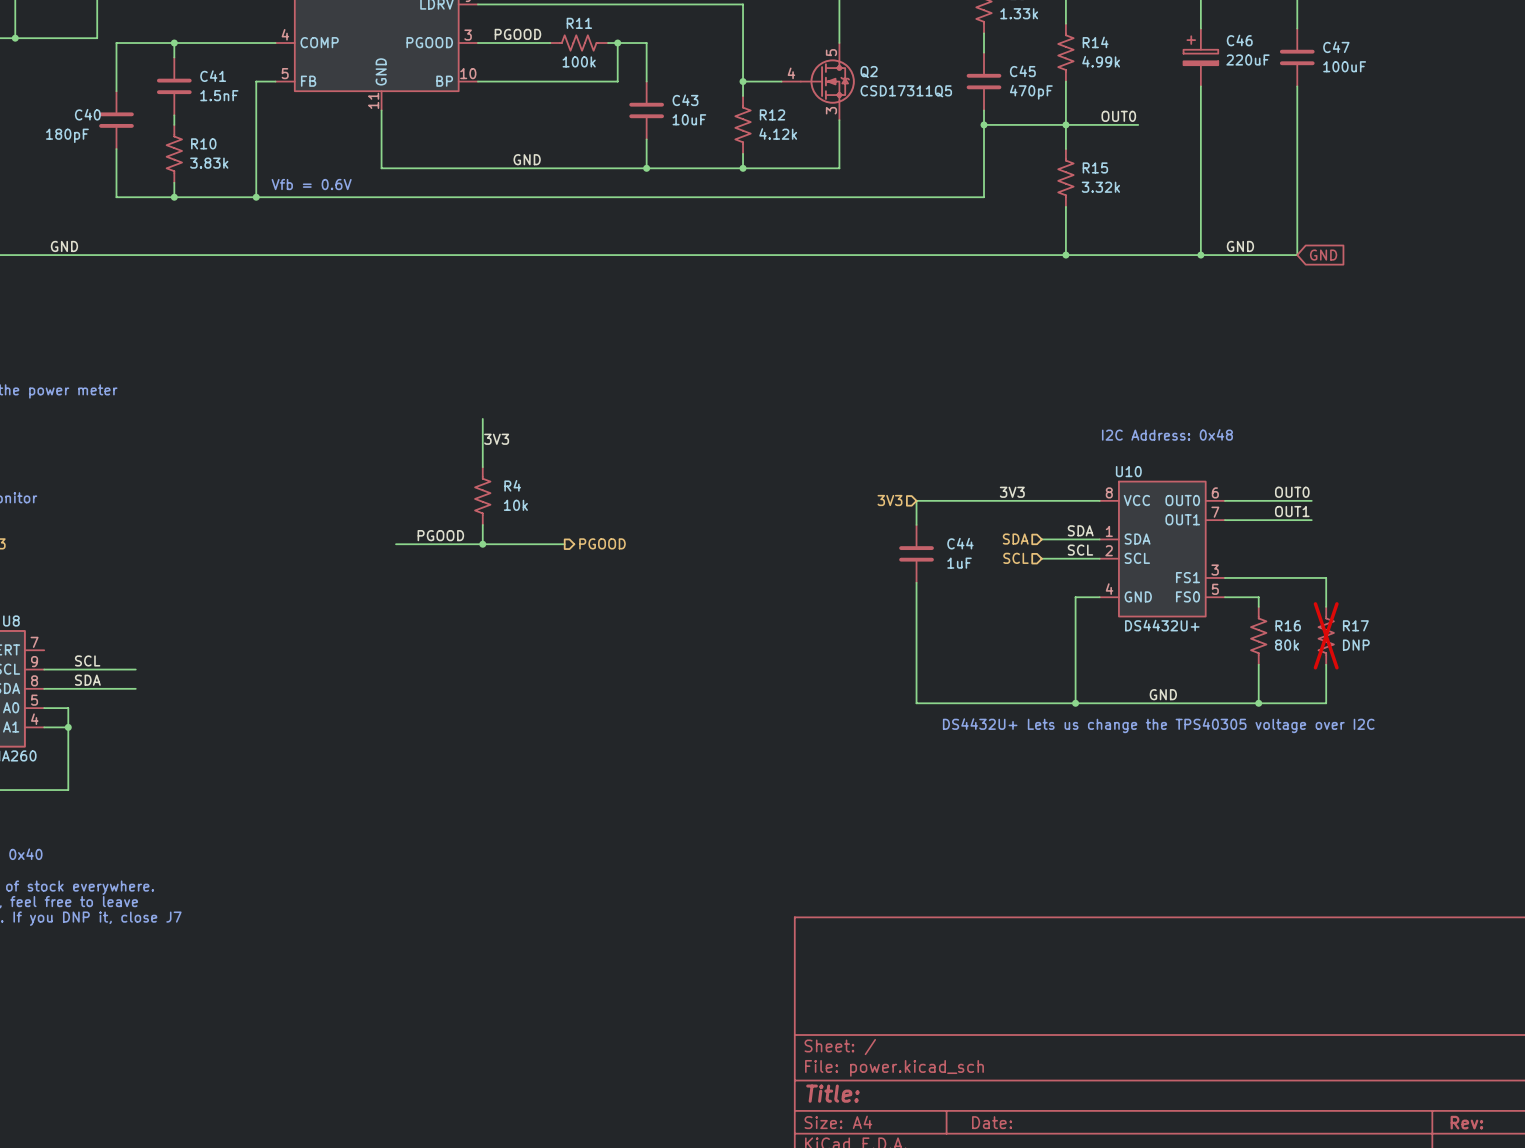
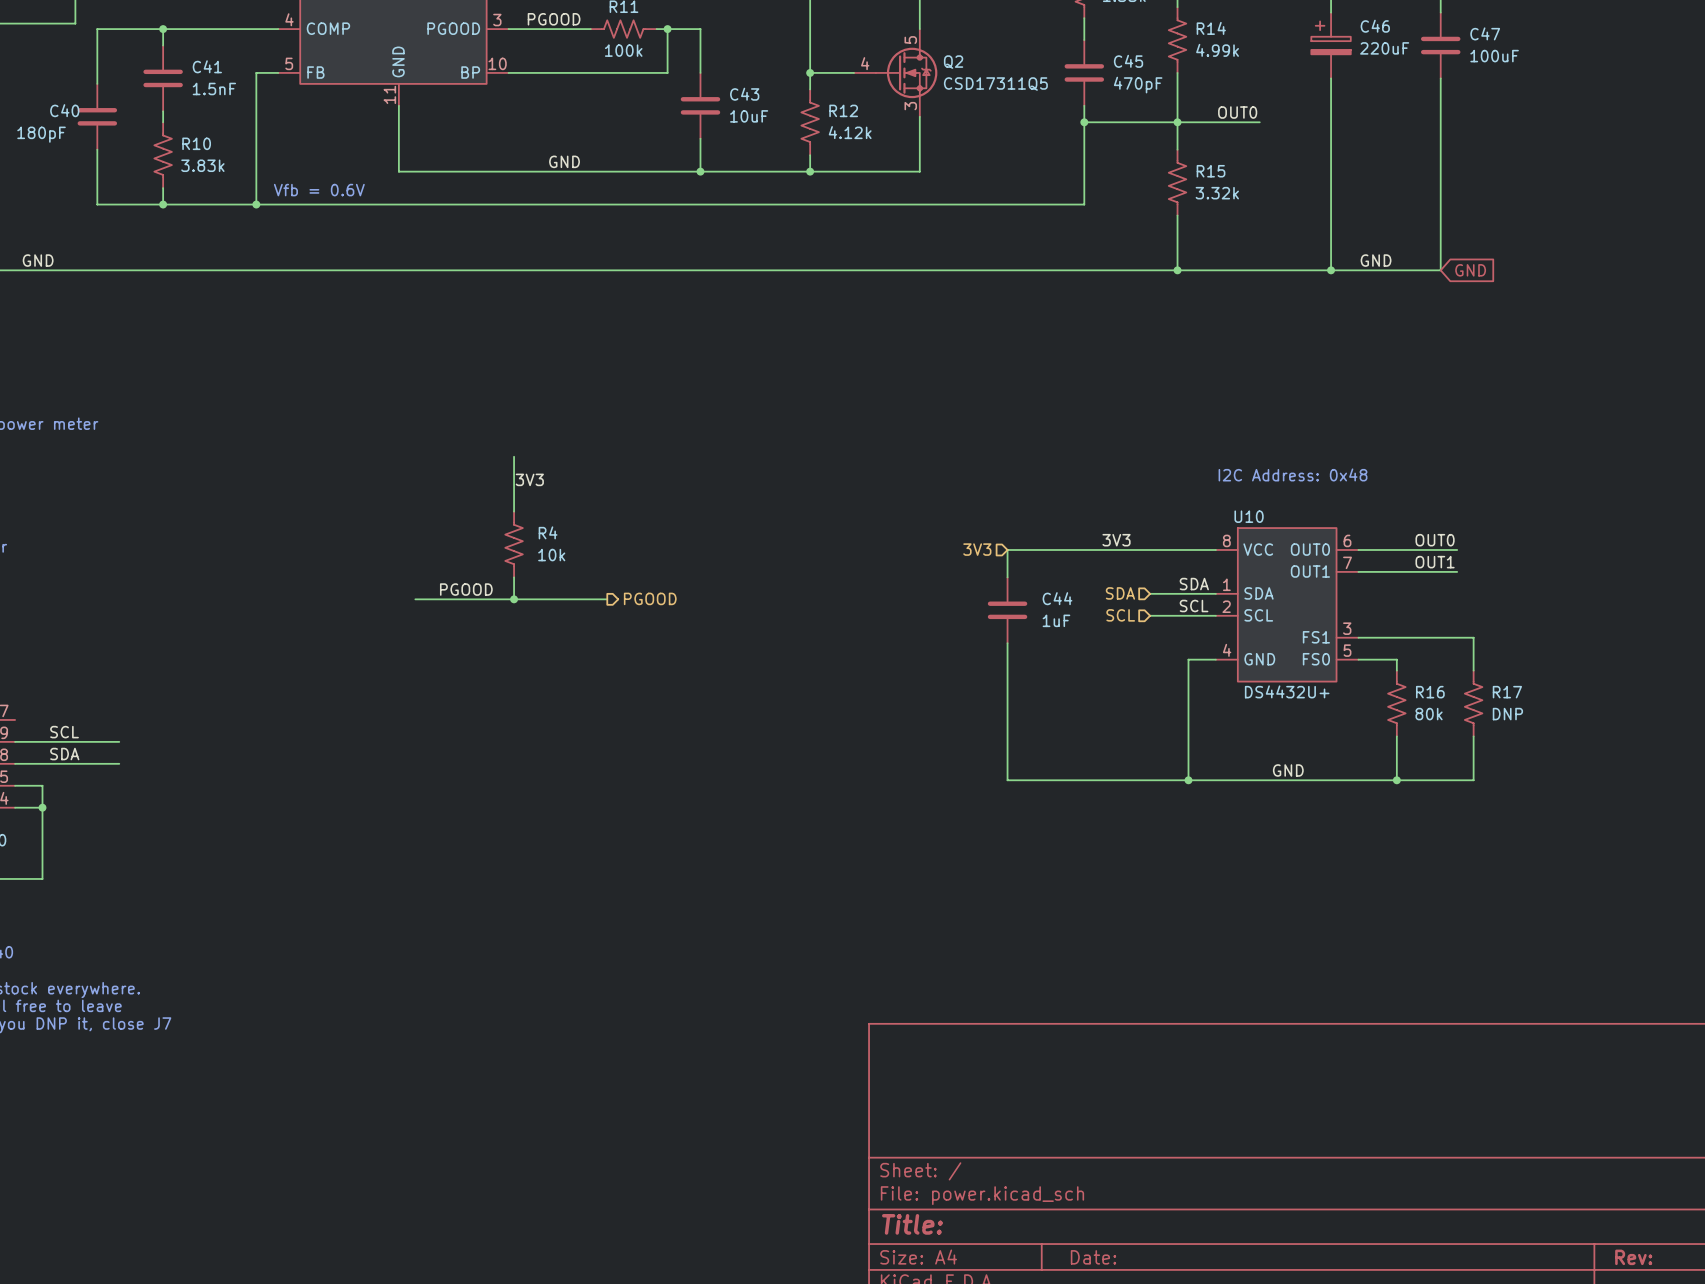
R17 do-not-place cross: (1326, 635) -> none
text: DS4432U+ Lets us change the TPS40305 voltage over I2C (1158, 725) -> none

